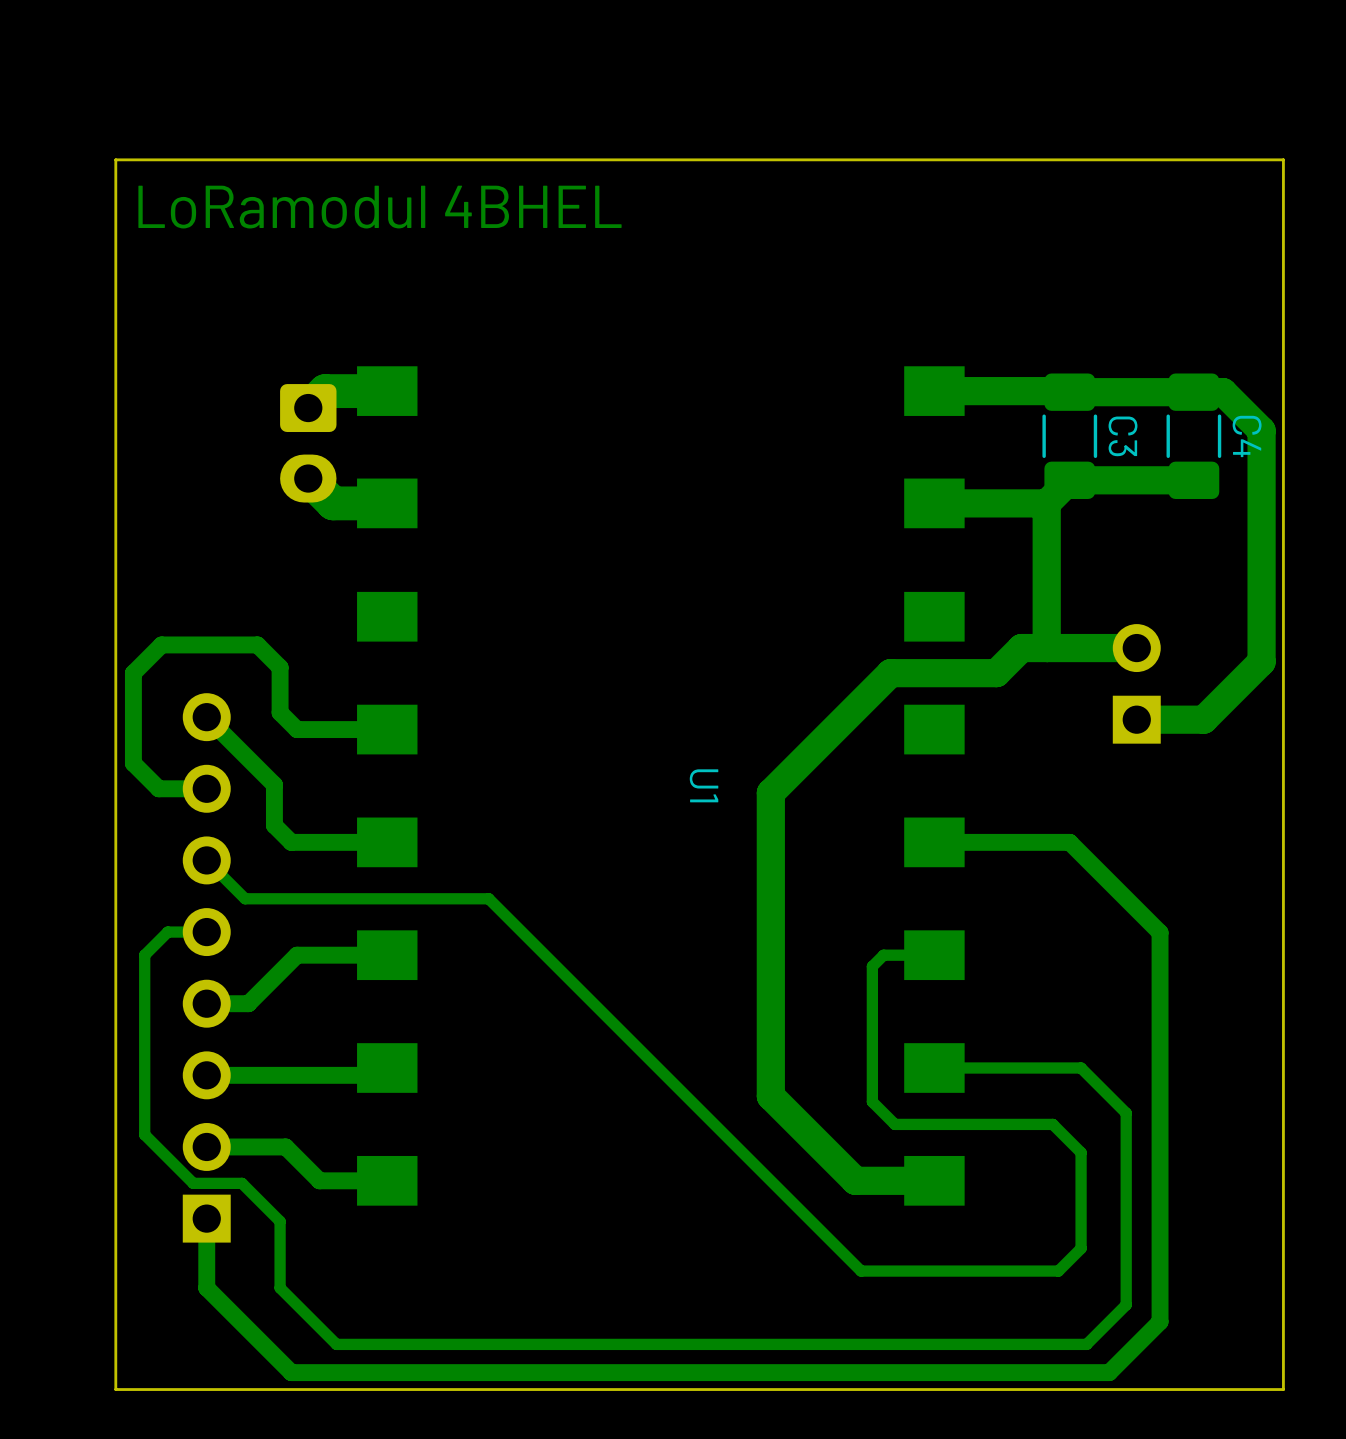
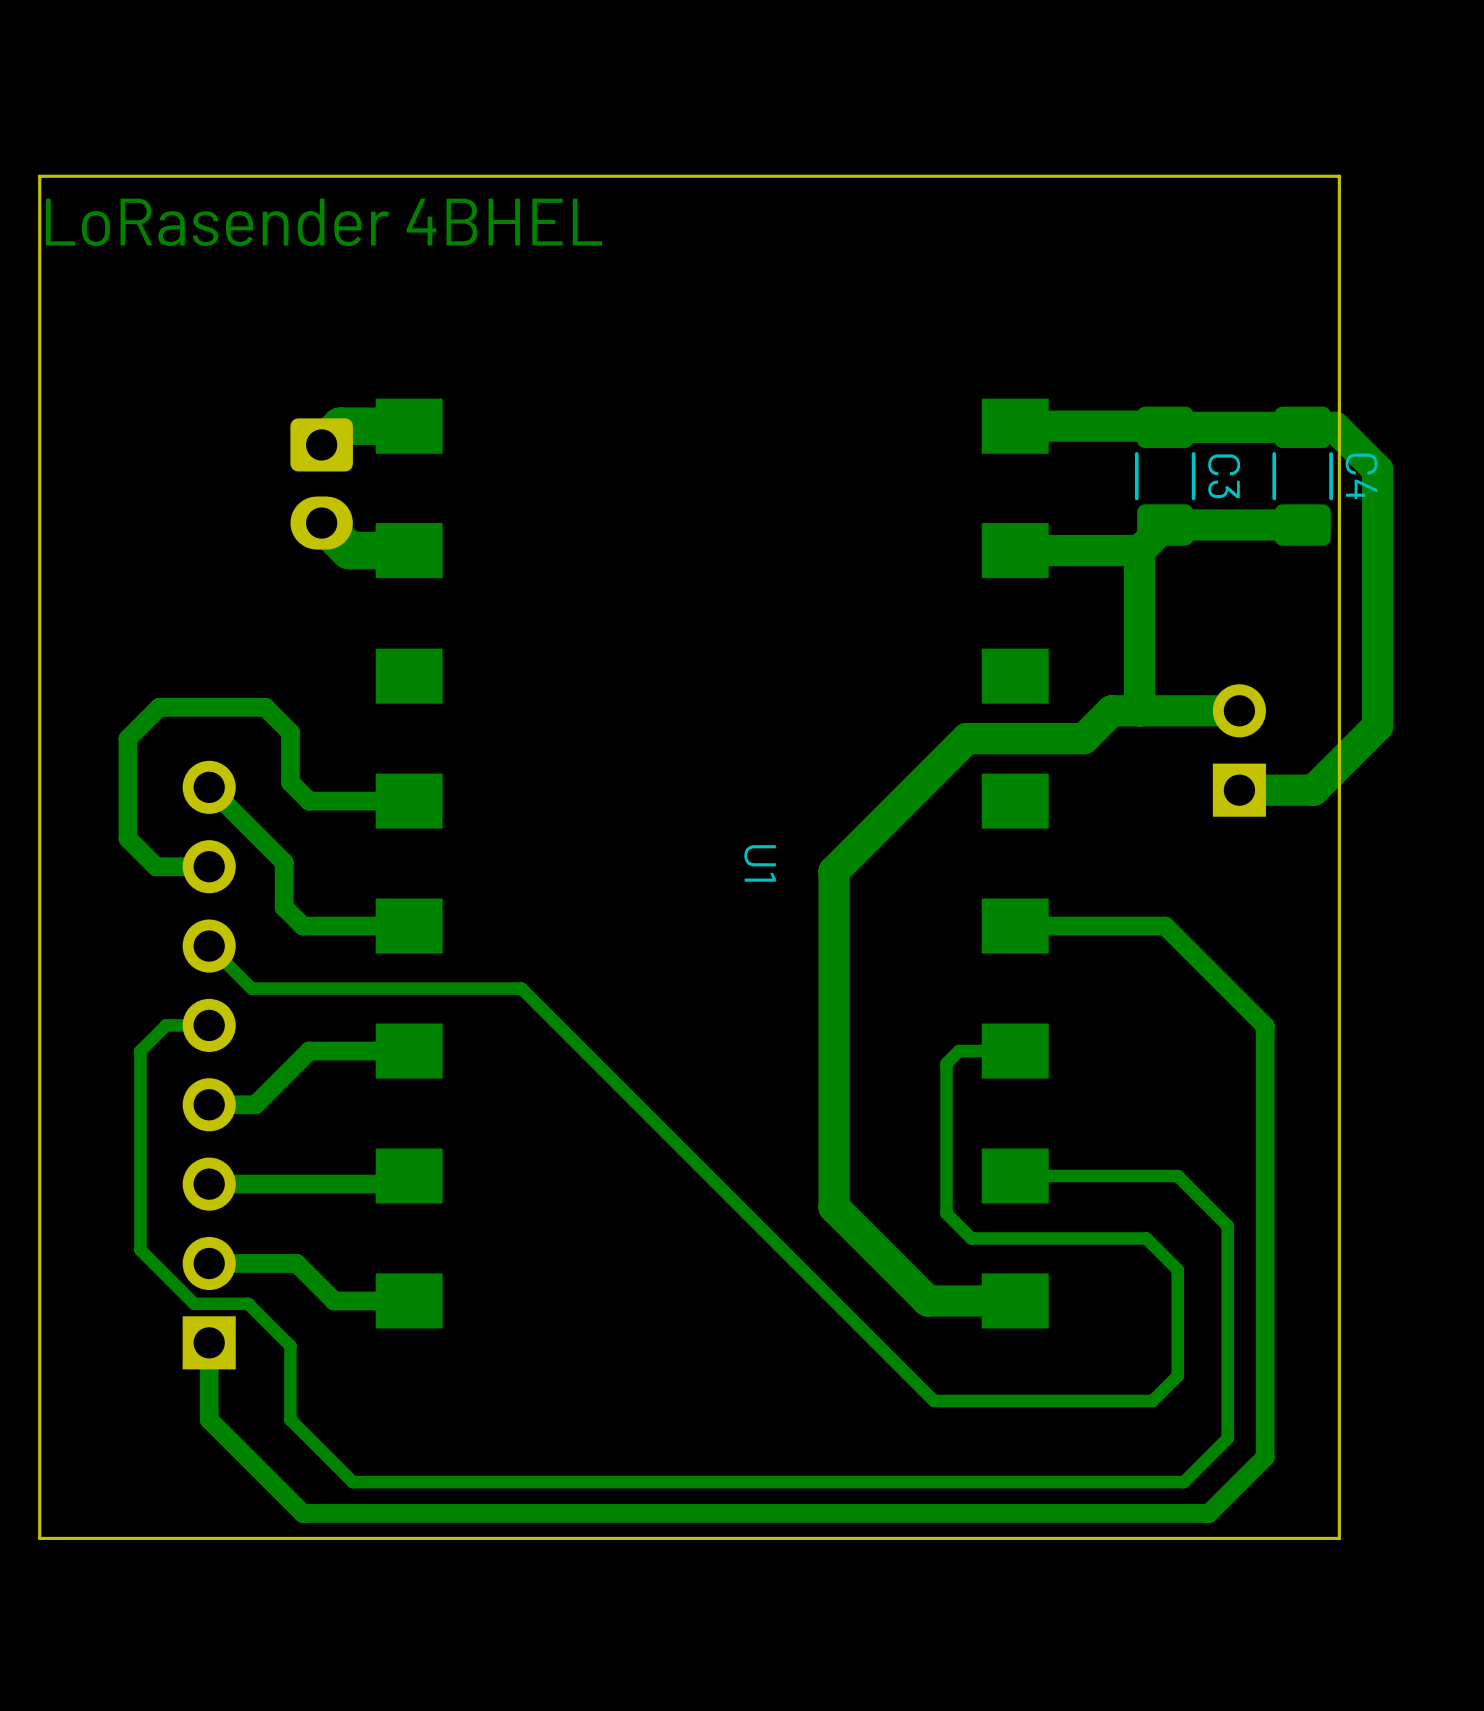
board edge: (1283, 159) (115, 159) (115, 1389) (1283, 1389) (1283, 159) -> (1339, 176) (1339, 1538) (39, 1538) (39, 176) (1339, 176)
text: LoRamodul 4BHEL (380, 207) -> LoRasender 4BHEL (324, 222)

